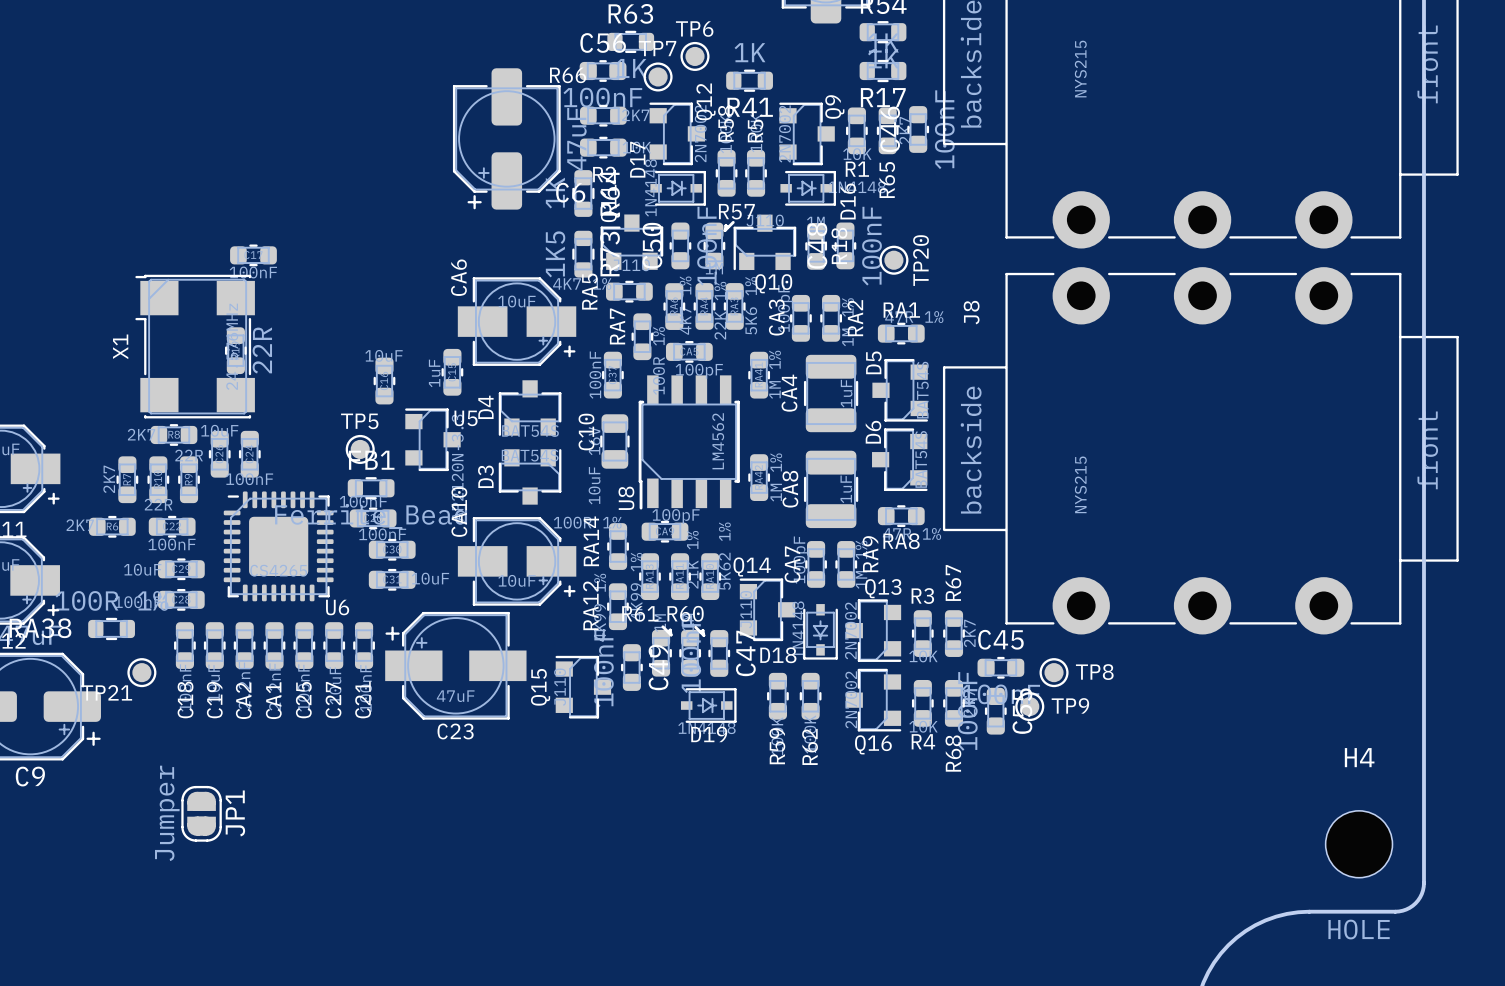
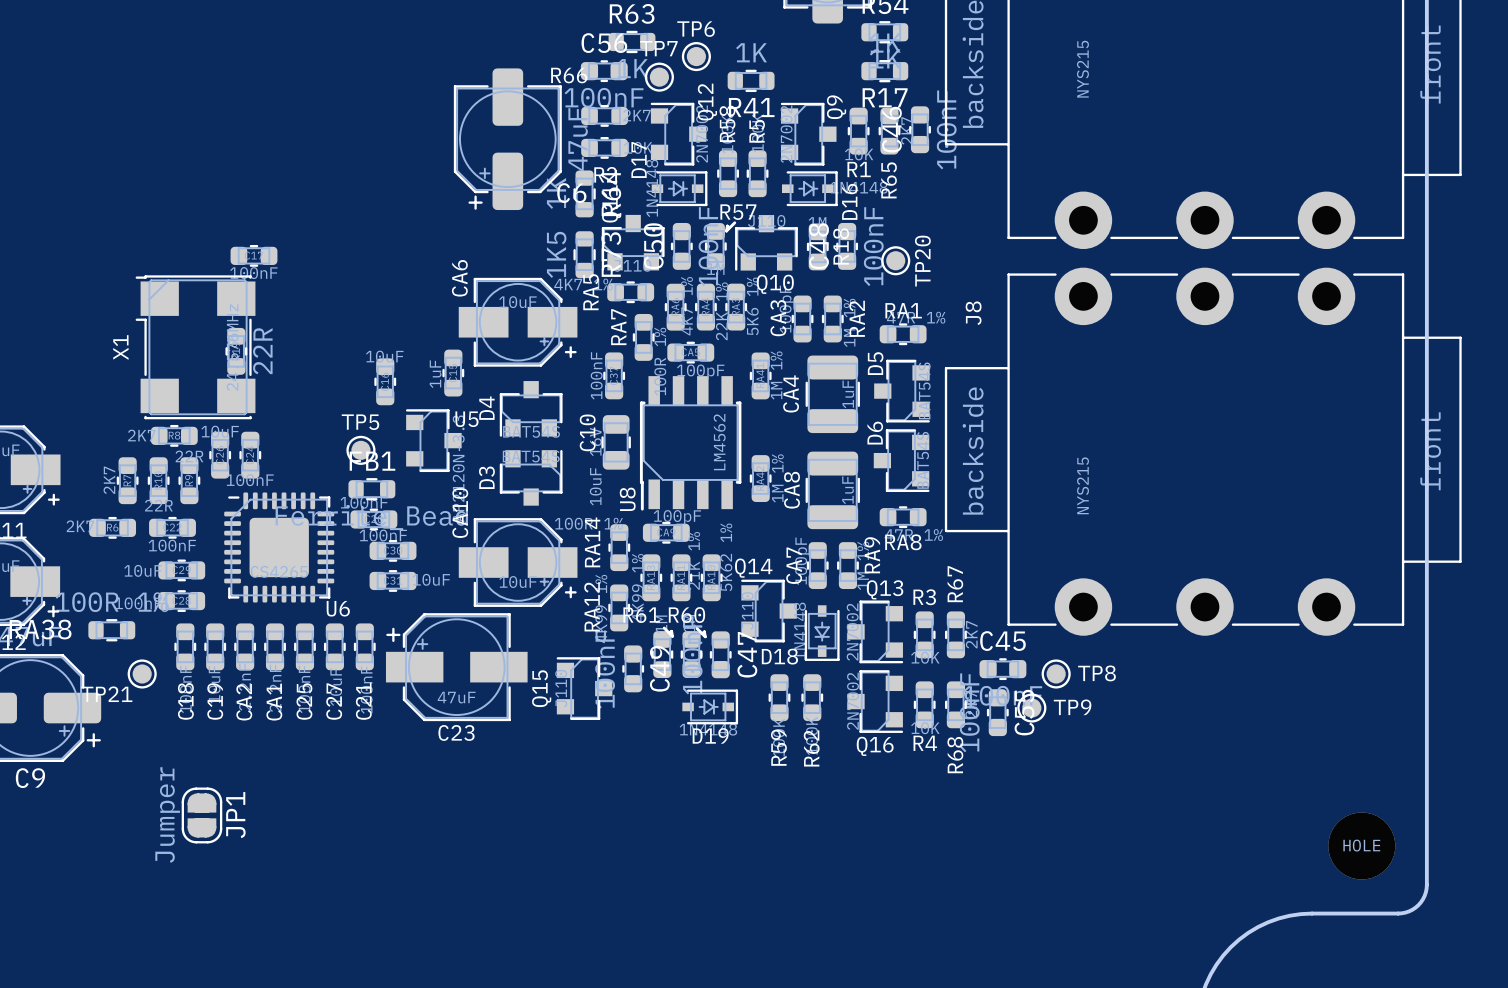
H4: HOLE (1359, 844) -> none
part: none -> HOLE (1361, 846)

